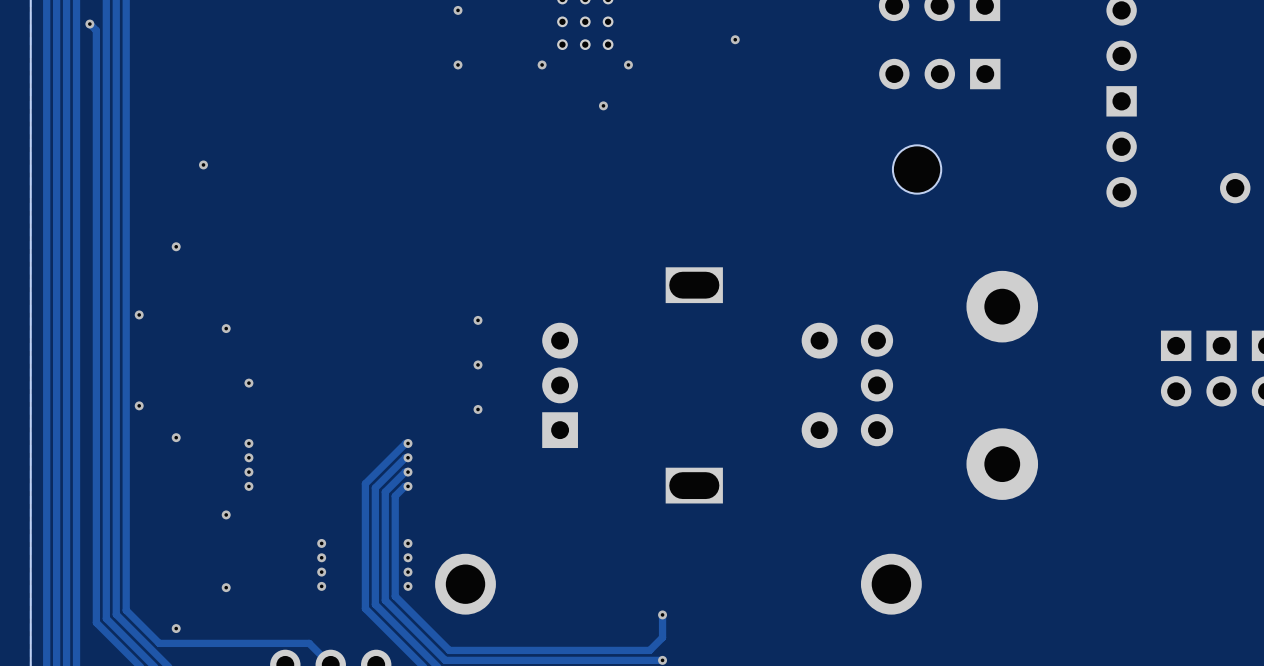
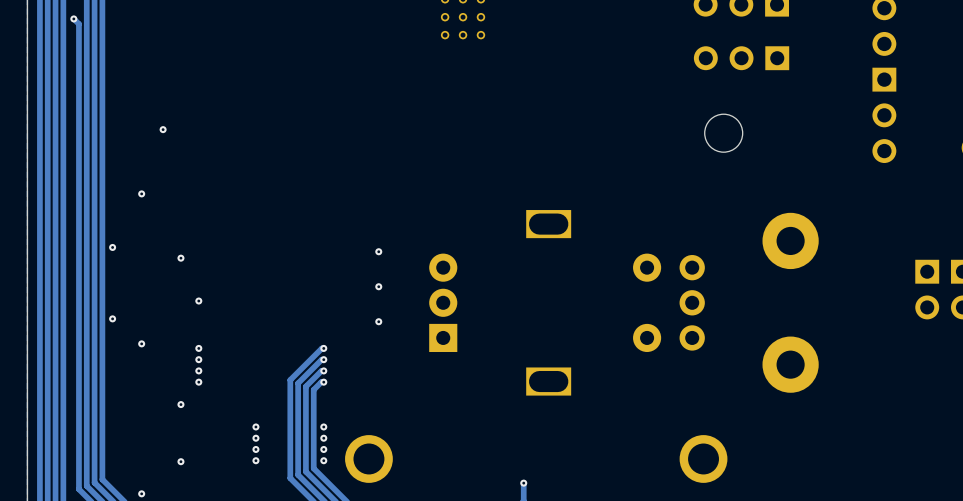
via: (458, 10) -> none
via: (735, 39) -> none
via: (458, 64) -> none
via: (542, 64) -> none
via: (628, 64) -> none
via: (603, 105) -> none

